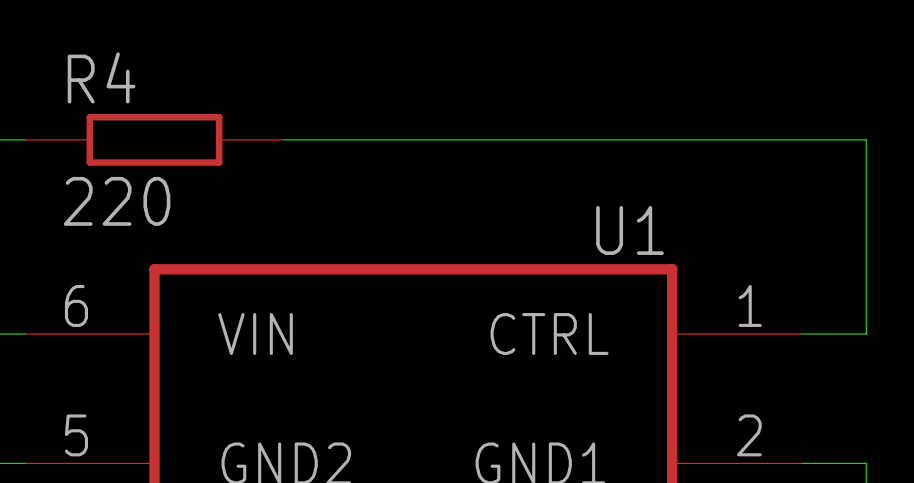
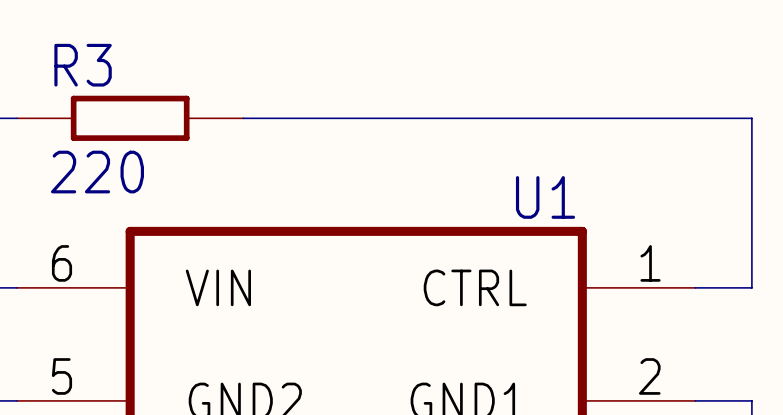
R4 name: R4 (101, 77) -> R3 (83, 65)

